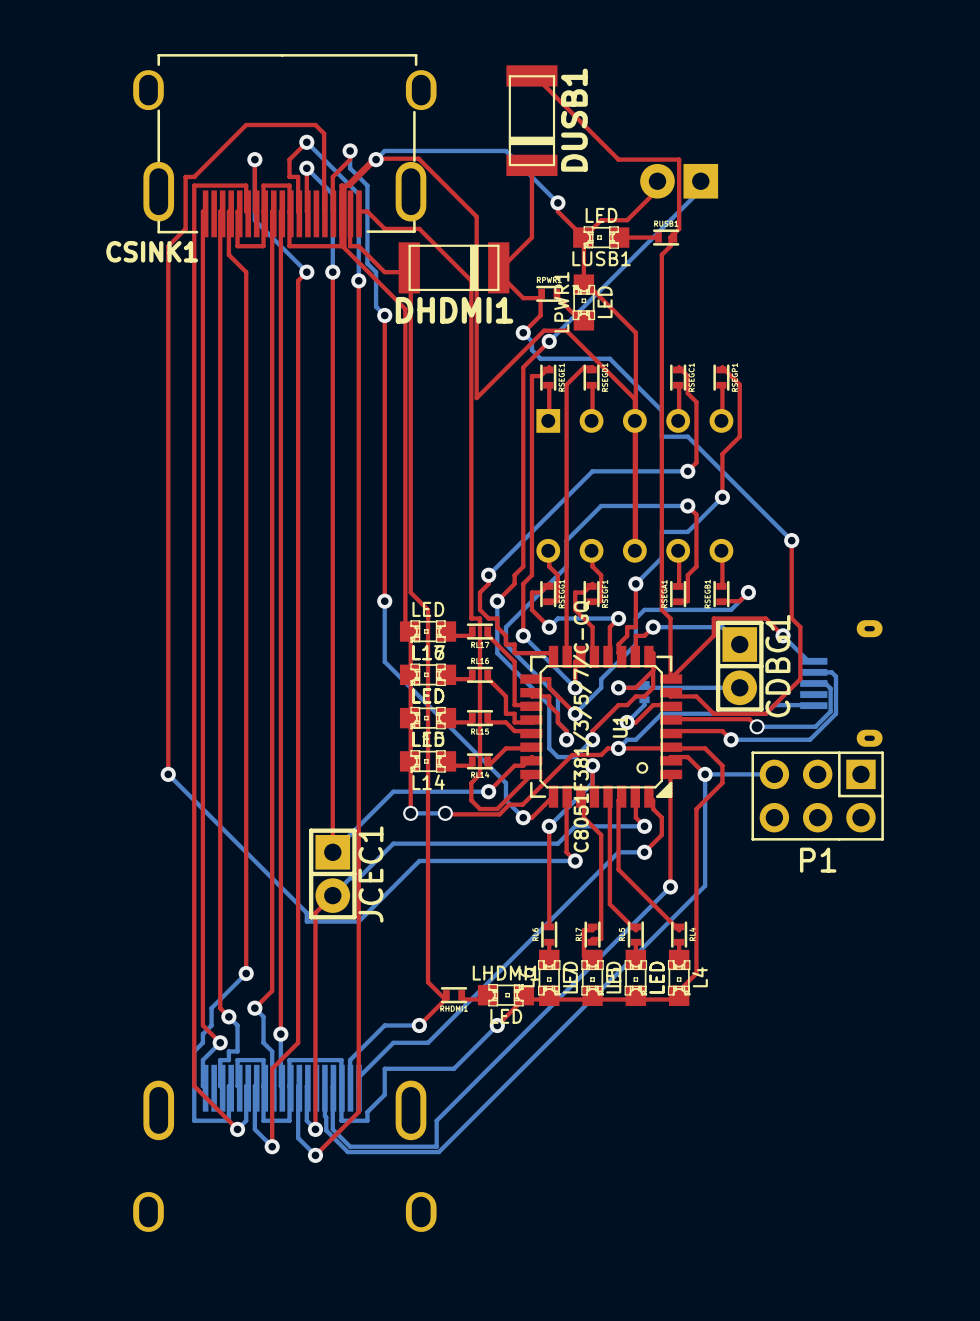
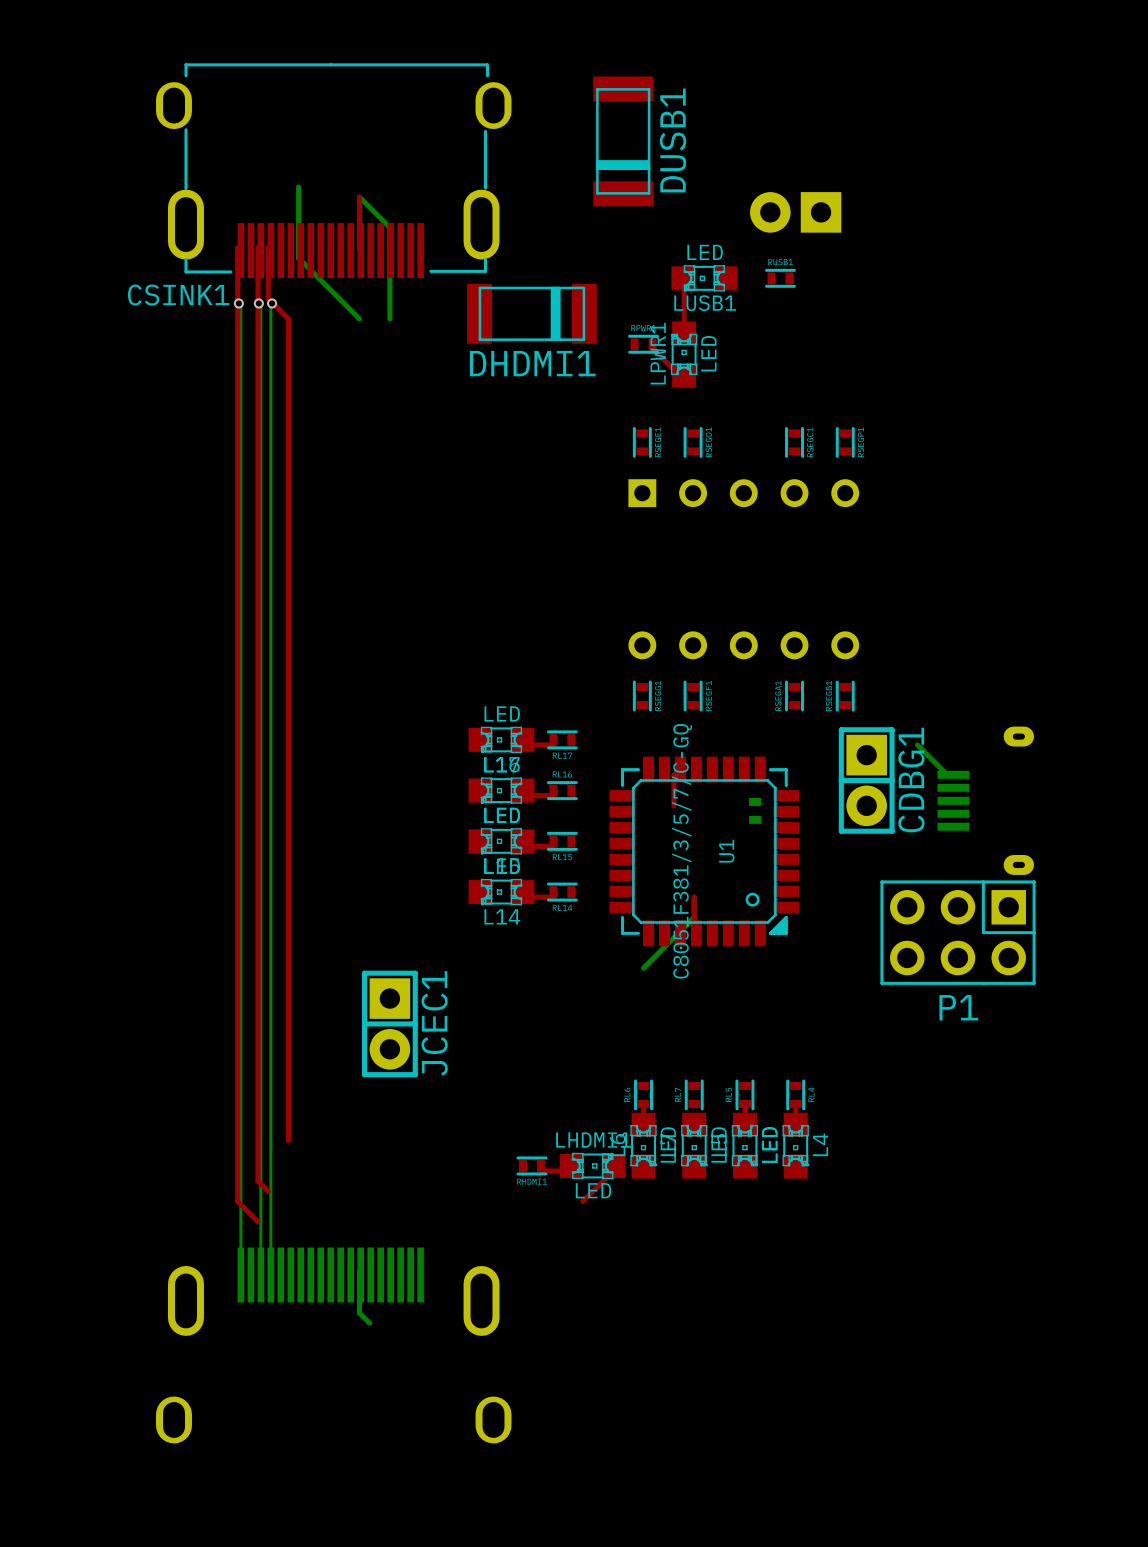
top track: (531, 75) (531, 73) (618, 159) (679, 159) (679, 228) (670, 237) -> none
bottom track: (306, 142) (358, 194) (358, 280) -> none
top track: (306, 142) (289, 159) (289, 176) (298, 176) (299, 213) -> none
via: (306, 142) -> none
bottom track: (350, 150) (350, 168) (367, 185) (367, 263) (376, 272) (376, 306) (384, 315) -> none
top track: (350, 150) (350, 159) (332, 176) (333, 213) -> none
via: (350, 150) -> none
top track: (254, 159) (254, 211) (256, 213) -> none
via: (254, 159) -> none
bottom track: (376, 159) (384, 150) (505, 150) (557, 202) -> none
top track: (376, 159) (350, 185) (341, 185) (341, 246) (289, 246) (289, 185) (263, 185) (263, 246) (237, 246) (237, 211) (239, 213) -> none
via: (376, 159) -> none
top track: (531, 165) (531, 237) (497, 272) -> none
via: (306, 168) -> none
top track: (657, 181) (661, 185) (627, 220) (601, 220) (583, 237) -> none
bottom track: (700, 181) (705, 185) (549, 341) -> none
top track: (557, 202) (557, 211) (583, 237) -> none
via: (557, 202) -> none
top track: (248, 213) (246, 211) (246, 185) (194, 185) (194, 1086) (237, 1129) -> none
top track: (273, 213) (272, 211) (272, 990) (254, 1008) -> none
top track: (282, 213) (280, 211) (280, 1034) -> none
top track: (324, 213) (324, 133) (315, 124) (246, 124) (194, 176) (185, 176) (185, 228) (168, 246) (168, 774) -> none
top track: (350, 213) (350, 211) (350, 246) (358, 246) (384, 272) (410, 272) -> none
top track: (359, 213) (358, 211) (367, 211) (384, 228) (419, 228) (471, 280) (471, 618) (479, 618) (479, 774) (471, 783) (471, 800) (479, 809) (497, 809) (531, 774) -> none
top track: (619, 237) (658, 237) -> none
top track: (670, 237) (670, 246) (661, 254) (661, 609) (670, 618) (670, 679) -> none
via: none -> (238, 303)
via: none -> (258, 303)
via: none -> (272, 303)
top track: (306, 272) (298, 280) (298, 1042) (272, 1068) (272, 1146) -> none
via: (306, 272) -> none
top track: (332, 272) (332, 852) -> none
via: (332, 272) -> none
top track: (410, 272) (410, 592) (428, 609) (428, 982) (445, 999) -> none
top track: (497, 272) (523, 298) (540, 298) -> none
top track: (358, 280) (358, 1112) (315, 1155) -> none
via: (358, 280) -> none
top track: (583, 280) (635, 332) (634, 550) (634, 399) (566, 330) (544, 330) (476, 398) (476, 216) (418, 158) (373, 158) (344, 187) (344, 248) (405, 309) (405, 626) (410, 631) (410, 635) (410, 813) -> none
top track: (540, 298) (540, 315) (523, 332) -> none
top track: (384, 315) (384, 601) -> none
via: (384, 315) -> none
bottom track: (523, 332) (531, 341) (531, 350) (540, 358) (609, 358) (661, 410) (661, 436) (687, 436) (791, 540) -> none
via: (523, 332) -> none
top track: (549, 341) (523, 367) (523, 566) (514, 575) (514, 583) (497, 601) -> none
via: (549, 341) -> none
top track: (548, 369) (549, 367) (540, 376) (531, 376) (531, 575) (523, 583) (523, 635) -> none
top track: (591, 369) (592, 367) (583, 367) (566, 384) (567, 656) -> none
top track: (678, 369) (679, 367) (687, 376) (687, 393) (696, 402) (696, 462) (687, 471) -> none
top track: (721, 369) (722, 367) (739, 384) (739, 436) (722, 454) (722, 497) -> none
top track: (548, 385) (548, 420) -> none
top track: (591, 385) (591, 420) -> none
top track: (678, 385) (678, 420) -> none
top track: (721, 385) (721, 420) -> none
bottom track: (687, 471) (592, 471) (488, 575) -> none
via: (687, 471) -> none
bottom track: (722, 497) (687, 531) (661, 531) (661, 557) (635, 583) -> none
via: (722, 497) -> none
bottom track: (687, 505) (601, 505) (566, 540) (566, 566) (505, 627) (505, 644) (557, 696) (557, 722) (566, 731) (566, 739) -> none
top track: (687, 505) (696, 514) (696, 566) (687, 575) (687, 601) (678, 601) -> none
via: (687, 505) -> none
top track: (791, 540) (791, 618) (800, 627) (800, 679) (765, 713) (713, 713) (696, 696) (670, 696) (671, 692) -> none
via: (791, 540) -> none
top track: (548, 550) (549, 549) (549, 566) (557, 575) (557, 601) (548, 601) -> none
top track: (591, 550) (592, 549) (592, 566) (601, 575) (601, 601) (591, 601) -> none
top track: (678, 550) (679, 549) (678, 586) -> none
top track: (721, 550) (722, 549) (721, 586) -> none
top track: (488, 575) (488, 583) (479, 592) (479, 609) (488, 618) (497, 618) (497, 627) (505, 635) (505, 644) (514, 644) (514, 653) (549, 653) (553, 656) -> none
via: (488, 575) -> none
top track: (635, 583) (635, 627) (627, 627) (627, 635) (618, 644) (618, 653) (621, 656) -> none
via: (635, 583) -> none
top track: (548, 586) (549, 583) (540, 592) (531, 592) (531, 609) (549, 627) -> none
top track: (591, 586) (592, 583) (583, 592) (575, 592) (575, 609) (592, 627) (592, 653) (594, 656) -> none
bottom track: (748, 592) (731, 609) (644, 609) (635, 618) (635, 644) (601, 679) (601, 687) (575, 713) -> none
top track: (748, 592) (739, 601) (721, 601) -> none
via: (748, 592) -> none
bottom track: (384, 601) (384, 661) (505, 783) (505, 800) (523, 817) -> none
via: (384, 601) -> none
bottom track: (497, 601) (497, 653) (549, 705) (549, 748) (557, 757) (575, 757) (592, 739) -> none
via: (497, 601) -> none
bottom track: (618, 618) (557, 618) (549, 627) -> none
top track: (618, 618) (609, 627) (609, 653) (608, 656) -> none
via: (618, 618) -> none
via: (549, 627) -> none
bottom track: (653, 627) (722, 627) (739, 644) -> none
top track: (653, 627) (644, 635) (635, 635) (635, 656) -> none
via: (653, 627) -> none
top track: (487, 631) (488, 635) (514, 661) (514, 705) (531, 706) -> none
bottom track: (523, 635) (575, 687) -> none
via: (523, 635) -> none
top track: (783, 635) (765, 618) (713, 618) (713, 635) (670, 679) -> none
via: (783, 635) -> none
top track: (648, 656) (653, 653) (653, 687) (644, 696) (635, 696) (627, 705) (618, 705) (592, 731) (592, 739) -> none
top track: (653, 670) (635, 687) (618, 687) -> none
bottom track: (813, 672) (831, 672) (835, 676) (835, 713) (810, 739) (731, 739) -> none
top track: (487, 674) (488, 679) (505, 696) (505, 713) (514, 713) (514, 722) (531, 722) (531, 719) -> none
top track: (531, 679) (549, 679) (549, 687) (575, 713) -> none
bottom track: (813, 683) (825, 683) (830, 688) (830, 711) (815, 726) (757, 726) -> none
via: (575, 687) -> none
bottom track: (618, 687) (739, 687) -> none
via: (618, 687) -> none
top track: (531, 692) (531, 696) (549, 696) (549, 705) (557, 713) (557, 722) (566, 731) (566, 739) -> none
bottom track: (644, 699) (644, 705) (627, 722) -> none
bottom track: (813, 705) (817, 705) (774, 705) (765, 713) (661, 713) (635, 739) (627, 739) (618, 748) -> none
top track: (671, 706) (653, 705) (635, 722) (627, 722) -> none
via: (575, 713) -> none
top track: (487, 718) (488, 722) (505, 722) (514, 731) (531, 731) (531, 733) -> none
top track: (671, 719) (749, 719) (757, 726) -> none
via: (627, 722) -> none
via: (757, 726) -> none
top track: (671, 733) (670, 731) (722, 731) (731, 739) -> none
via: (566, 739) -> none
via: (592, 739) -> none
via: (731, 739) -> none
top track: (531, 747) (505, 748) (488, 765) (487, 761) -> none
via: (618, 748) -> none
top track: (531, 760) (531, 757) (523, 765) (514, 765) (488, 791) -> none
top track: (671, 760) (670, 757) (687, 757) (705, 774) -> none
via: (592, 765) -> none
bottom track: (168, 774) (306, 912) (306, 921) (358, 921) (419, 860) (575, 860) -> none
via: (168, 774) -> none
top track: (671, 774) (670, 886) -> none
via: (705, 774) -> none
bottom track: (774, 774) (705, 774) (705, 885) (438, 1152) (347, 1152) (326, 1130) (324, 1088) -> none
bottom track: (488, 791) (393, 791) (332, 852) -> none
via: (488, 791) -> none
top track: (553, 796) (531, 817) (523, 817) -> none
top track: (567, 796) (566, 852) (575, 860) -> none
top track: (580, 796) (583, 800) (583, 817) (601, 835) (601, 938) (592, 938) (592, 942) -> none
top track: (608, 796) (609, 800) (609, 904) (635, 930) (635, 926) -> none
top track: (621, 796) (618, 800) (618, 869) (679, 930) (679, 926) -> none
top track: (635, 796) (635, 817) (644, 826) -> none
top track: (648, 796) (653, 800) (653, 809) (661, 817) (661, 835) (644, 852) -> none
bottom track: (410, 813) (445, 813) -> none
via: (410, 813) -> none
top track: (445, 813) (499, 814) (509, 804) (522, 804) (572, 754) (601, 754) (607, 748) (705, 748) (722, 765) (722, 783) (696, 809) (696, 973) (679, 990) (679, 999) (523, 999) (523, 995) -> none
via: (445, 813) -> none
via: (523, 817) -> none
top track: (549, 826) (549, 926) -> none
via: (549, 826) -> none
bottom track: (644, 826) (575, 826) (557, 843) (393, 843) (358, 878) (350, 878) (332, 895) -> none
via: (644, 826) -> none
bottom track: (644, 852) (618, 852) (428, 1042) (393, 1042) (358, 1077) (359, 1088) -> none
via: (644, 852) -> none
via: (575, 860) -> none
bottom track: (670, 886) (436, 1120) (436, 1146) (350, 1146) (332, 1129) (332, 1086) (333, 1088) -> none
via: (670, 886) -> none
top track: (332, 895) (315, 912) (315, 1129) -> none
top track: (592, 926) (592, 930) (583, 930) (583, 956) (592, 956) (592, 959) -> none
bottom track: (246, 973) (211, 1008) (211, 1025) (202, 1034) (202, 1042) (194, 1051) (194, 1120) (228, 1120) (228, 1086) (231, 1088) -> (272, 303) (270, 1274)
via: (246, 973) -> none
top track: (445, 999) (419, 1025) -> none
bottom track: (254, 1008) (263, 1016) (263, 1042) (272, 1051) (272, 1086) (273, 1088) -> none
via: (254, 1008) -> none
bottom track: (228, 1016) (237, 1025) (237, 1051) (228, 1051) (228, 1060) (220, 1060) (220, 1086) (222, 1088) -> (258, 303) (260, 305) (260, 1274)
via: (228, 1016) -> none
bottom track: (419, 1025) (384, 1025) (350, 1060) (350, 1088) -> none
via: (419, 1025) -> none
bottom track: (497, 1025) (454, 1068) (384, 1068) (384, 1094) (367, 1112) (367, 1120) (341, 1120) (341, 1060) (289, 1060) (289, 1120) (263, 1120) (263, 1060) (237, 1060) (237, 1086) (239, 1088) -> none
via: (497, 1025) -> none
bottom track: (280, 1034) (282, 1088) -> none
via: (280, 1034) -> none
bottom track: (220, 1042) (202, 1060) (202, 1086) (205, 1088) -> (238, 303) (240, 304) (240, 1274)
via: (220, 1042) -> none
bottom track: (248, 1088) (246, 1086) (246, 1120) (237, 1129) -> none
bottom track: (256, 1088) (254, 1086) (254, 1129) (272, 1146) -> none
bottom track: (299, 1088) (298, 1086) (298, 1138) (315, 1155) -> none
via: (237, 1129) -> none
via: (315, 1129) -> none
via: (272, 1146) -> none
via: (315, 1155) -> none

